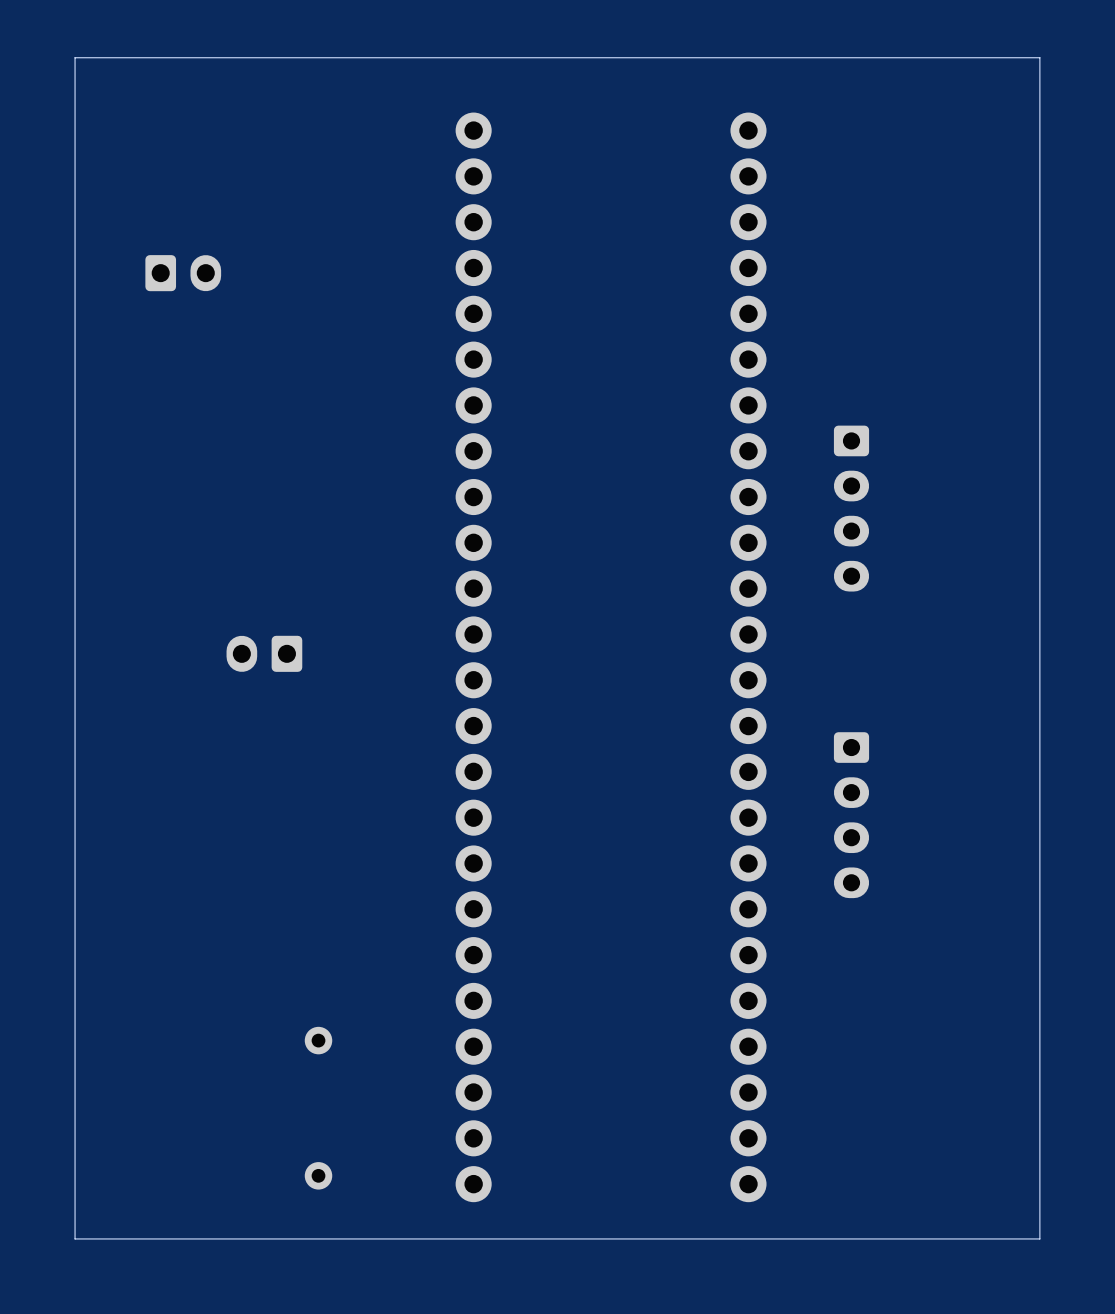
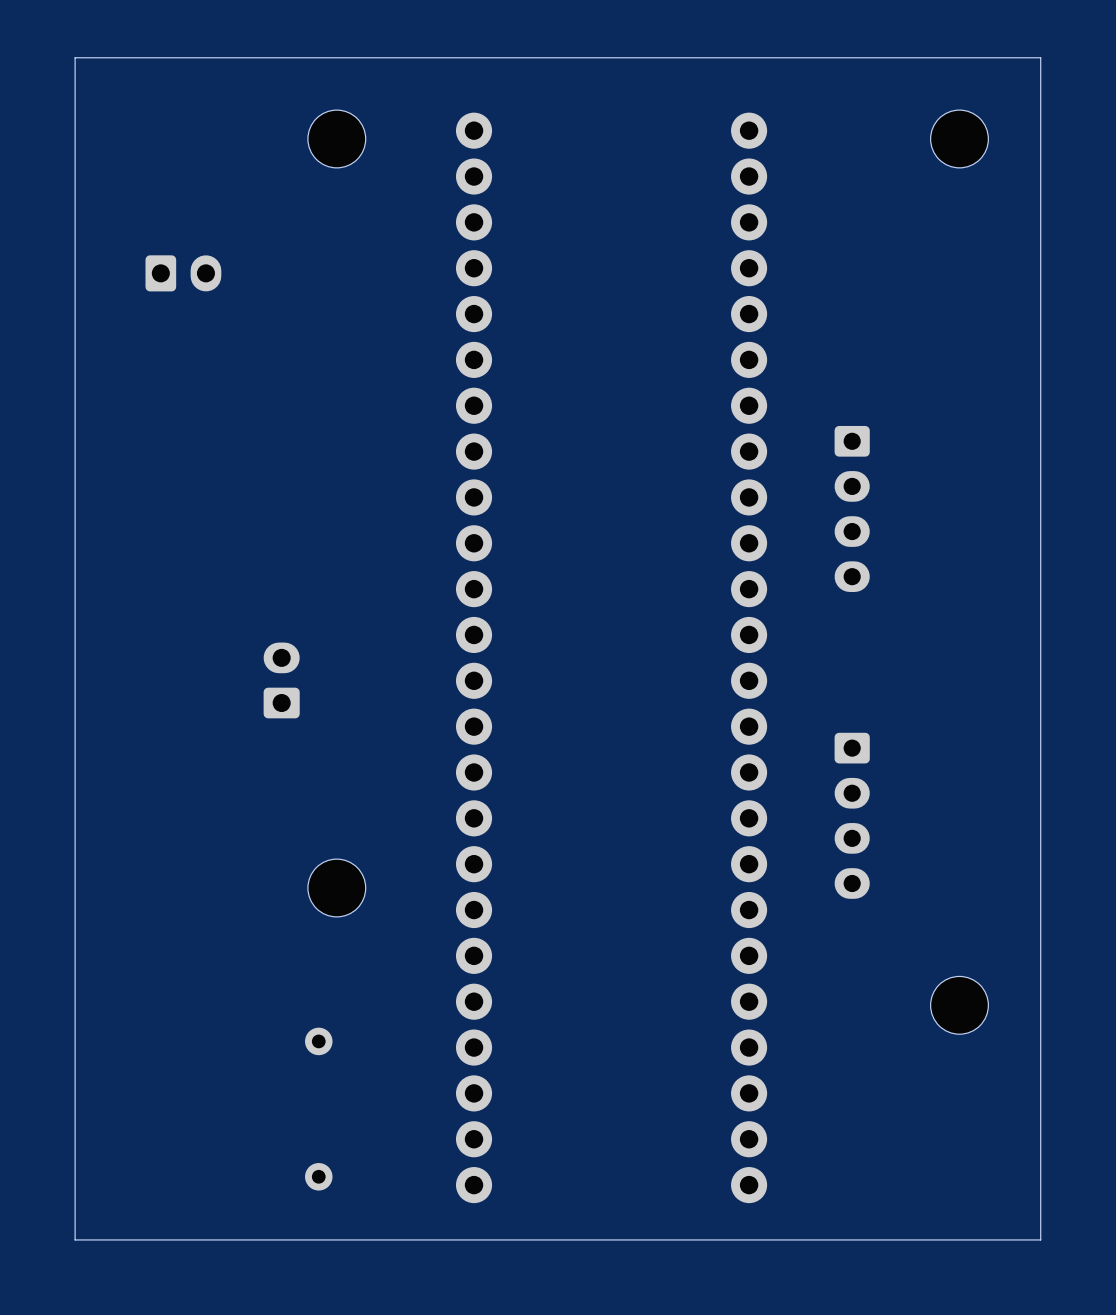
part: none -> (336, 138)
part: none -> (959, 138)
part rotation: 0° (264, 653) -> 90° clockwise (281, 680)
part: none -> (336, 888)
part: none -> (959, 1005)

